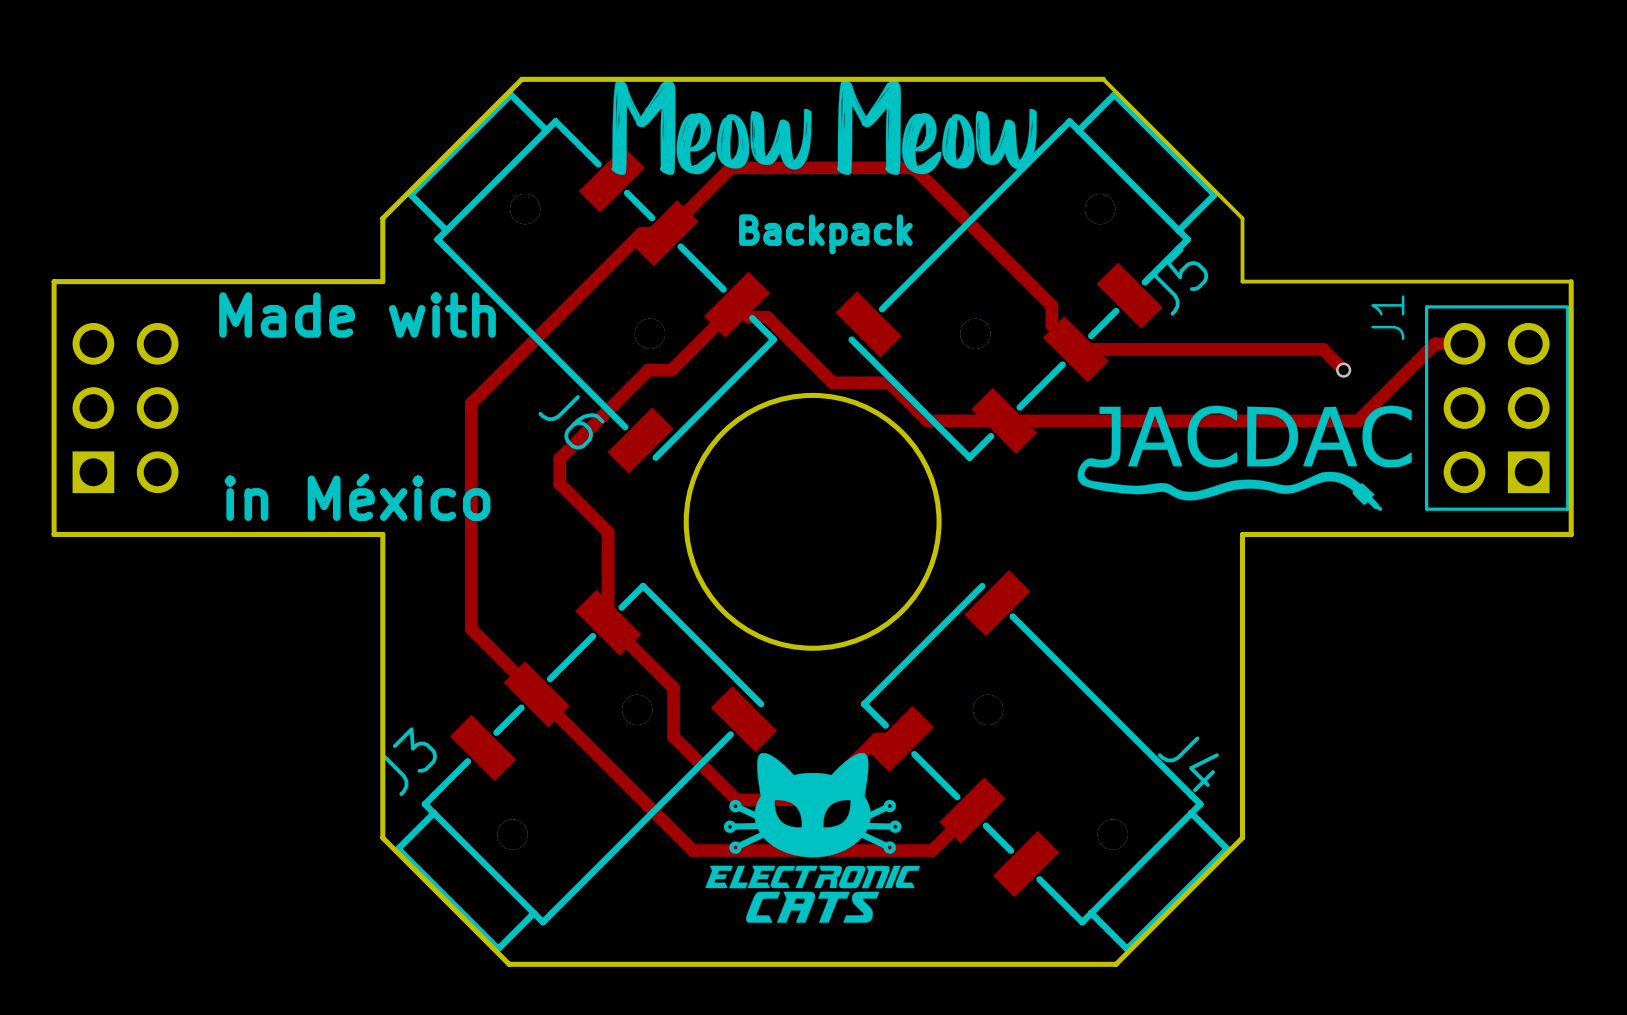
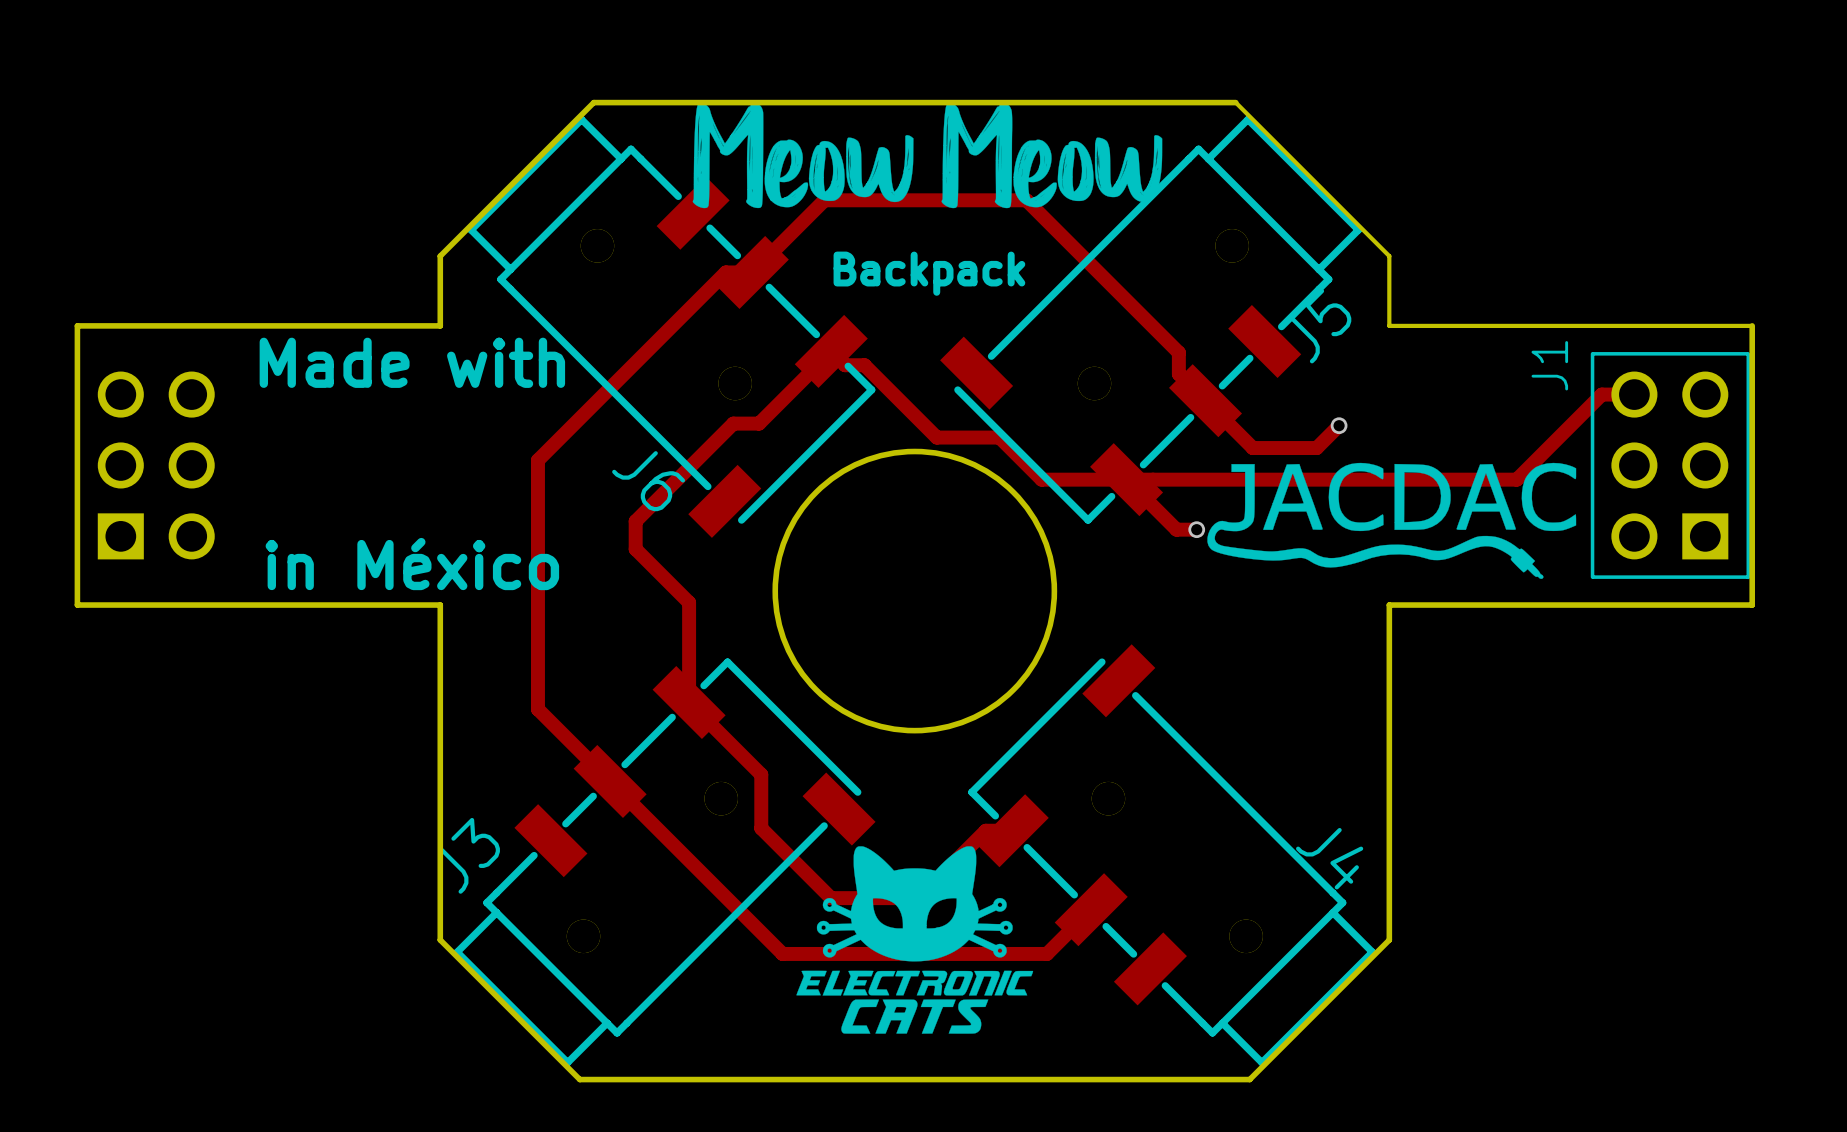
track: (1075, 349) (1322, 349) (1343, 370) -> (1205, 400) (1252, 448) (1316, 448) (1339, 425)
via: (1343, 370) -> none
via: none -> (1339, 425)
track: none -> (1126, 479) (1176, 529) (1196, 529)
via: none -> (1196, 529)

